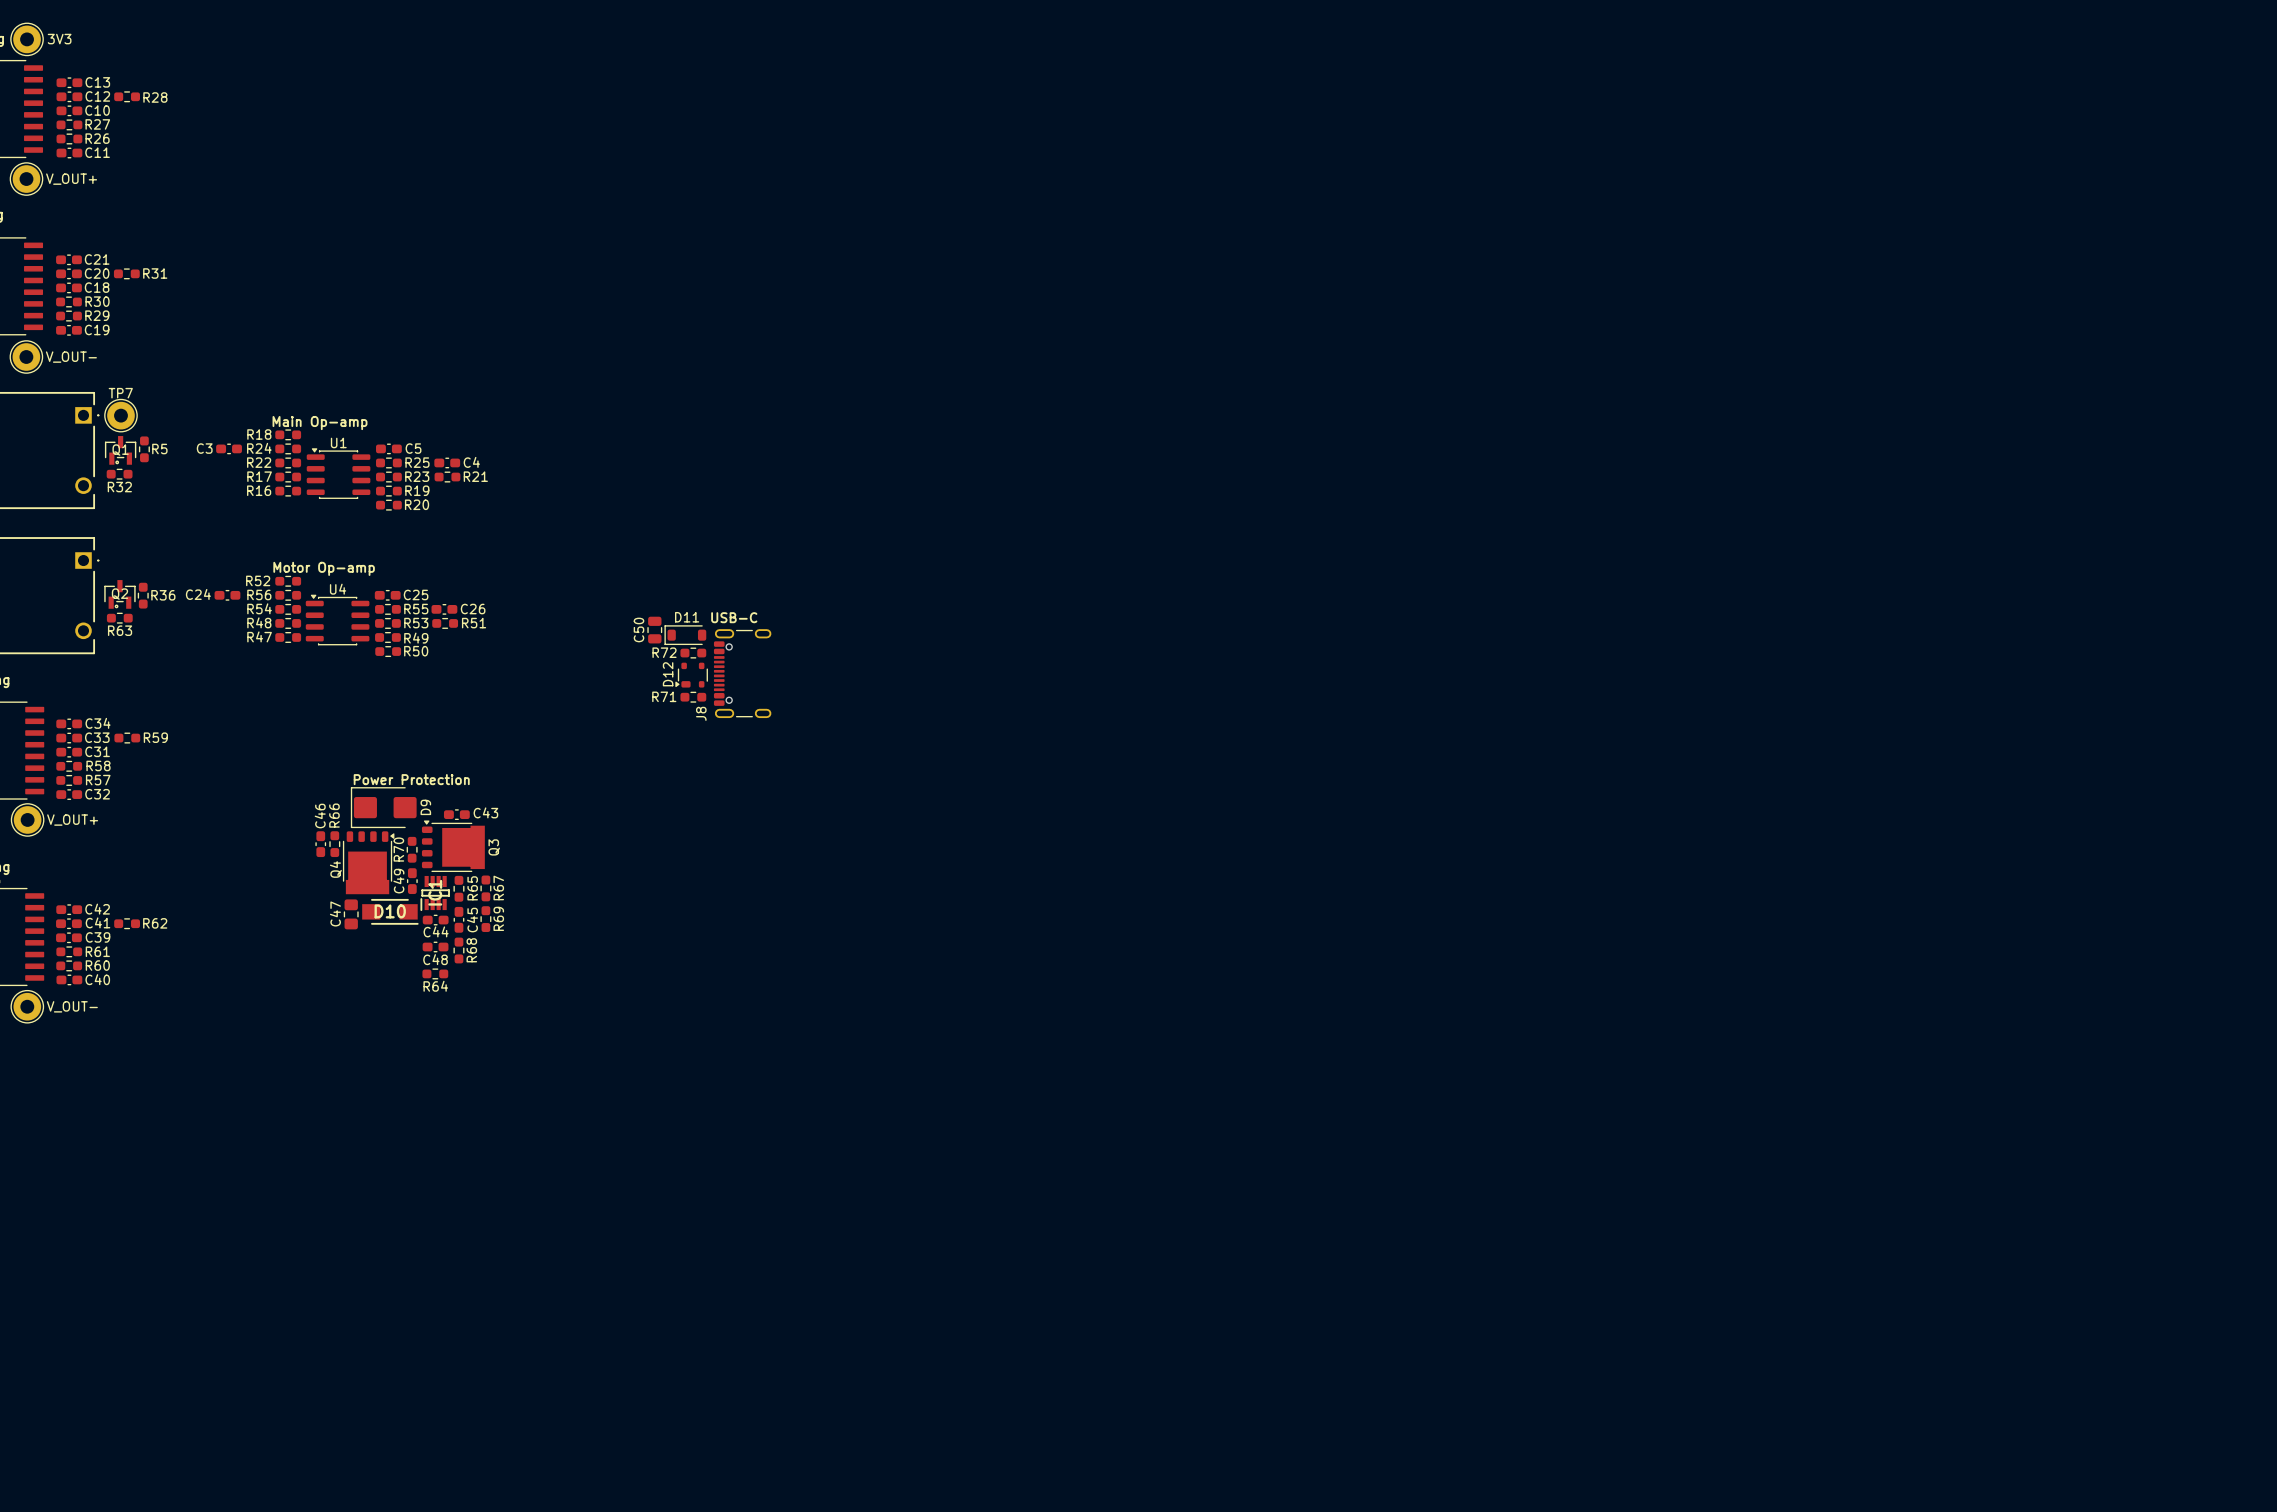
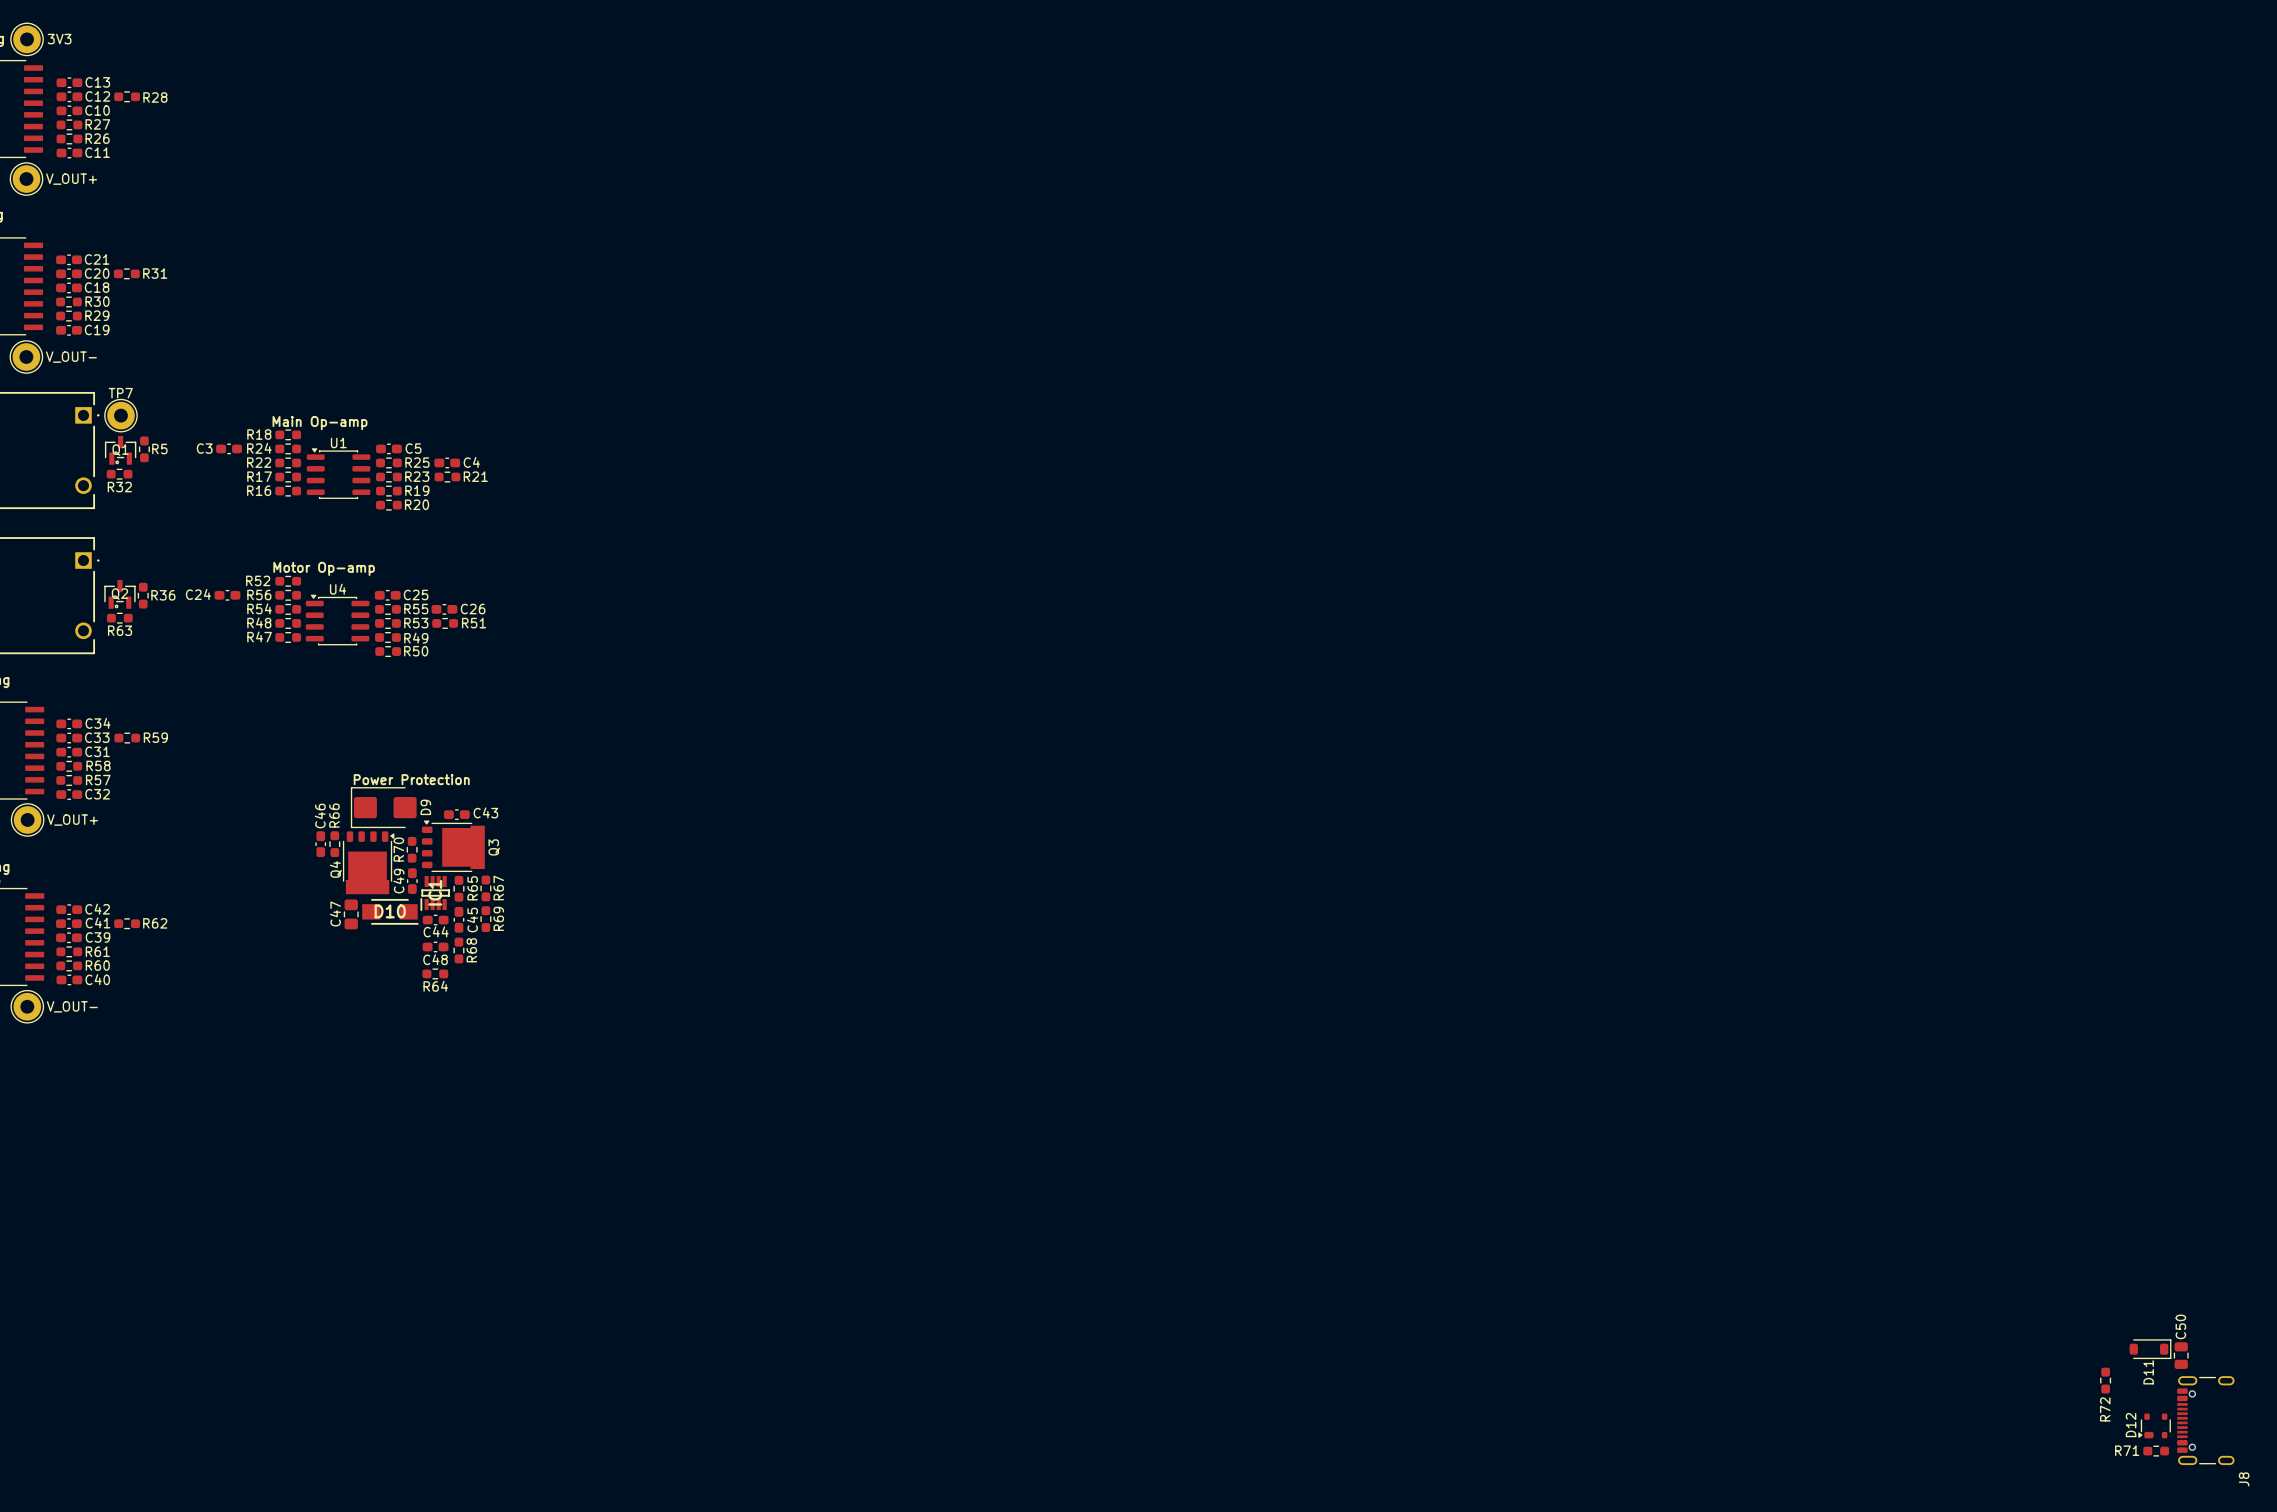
text: USB-C (734, 617) -> none
C50 name position: C50 (638, 629) -> C50 (2180, 1326)
C50 position: (654, 630) -> (2181, 1355)
D11 rotation: 0° (685, 635) -> 180° (2150, 1349)
D11 position: (685, 635) -> (2150, 1349)
R72 name position: R72 (664, 652) -> R72 (2105, 1409)
R72 rotation: 0° (693, 653) -> 90° clockwise (2105, 1380)
R72 position: (693, 653) -> (2105, 1380)
J8 position: (742, 673) -> (2205, 1420)
D12 position: (691, 675) -> (2154, 1425)
R71 position: (693, 697) -> (2156, 1451)
J8 name position: J8 (701, 713) -> J8 (2244, 1479)

